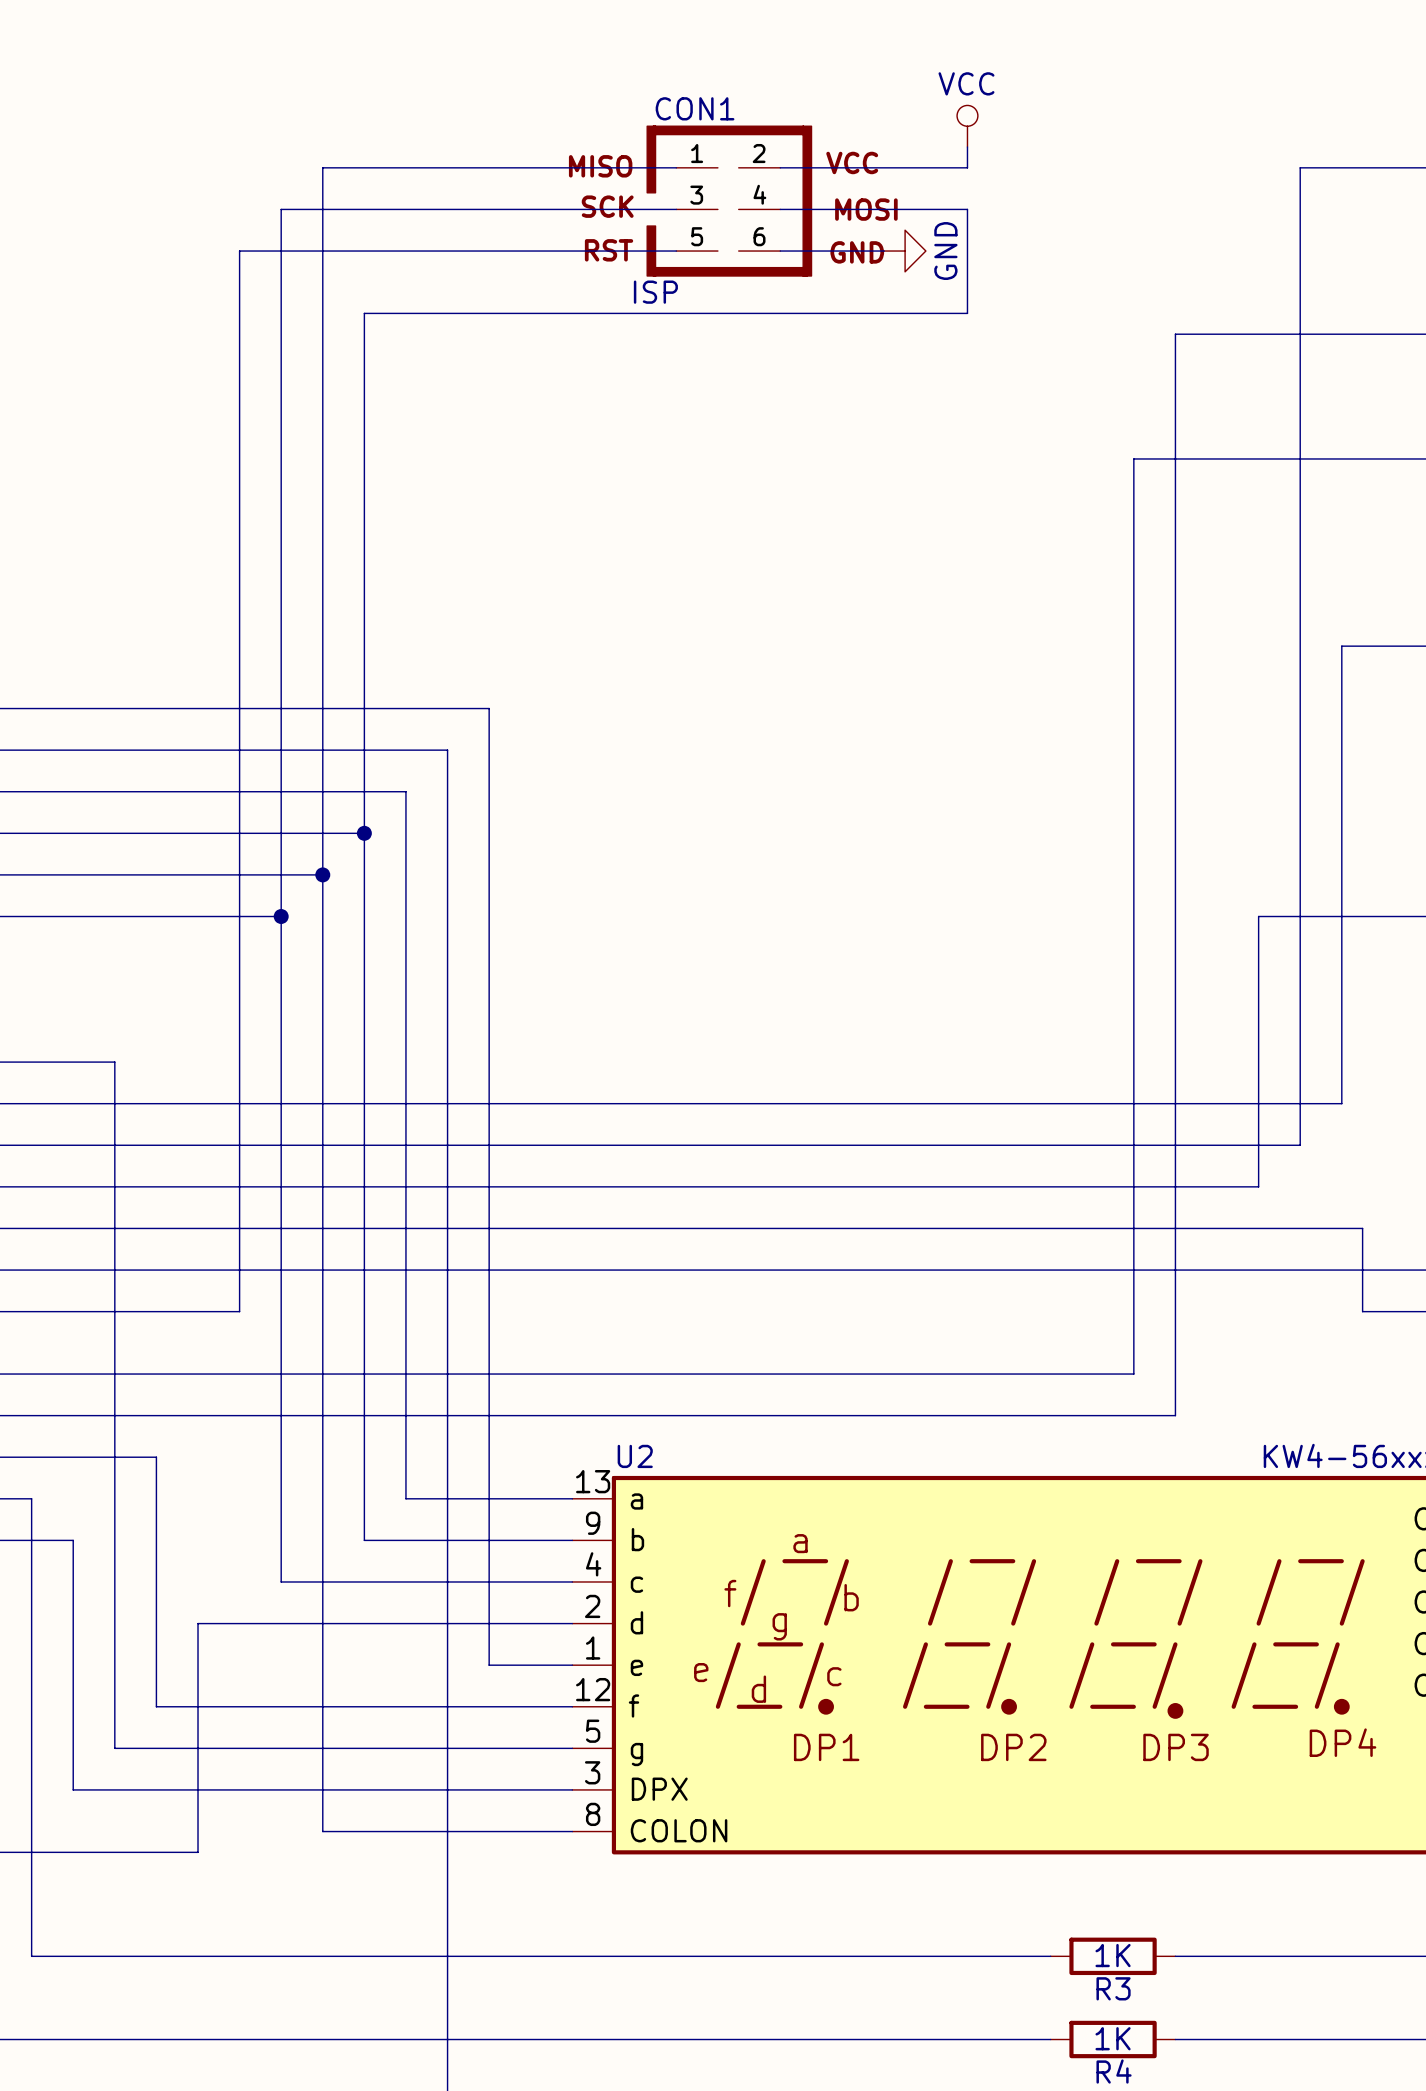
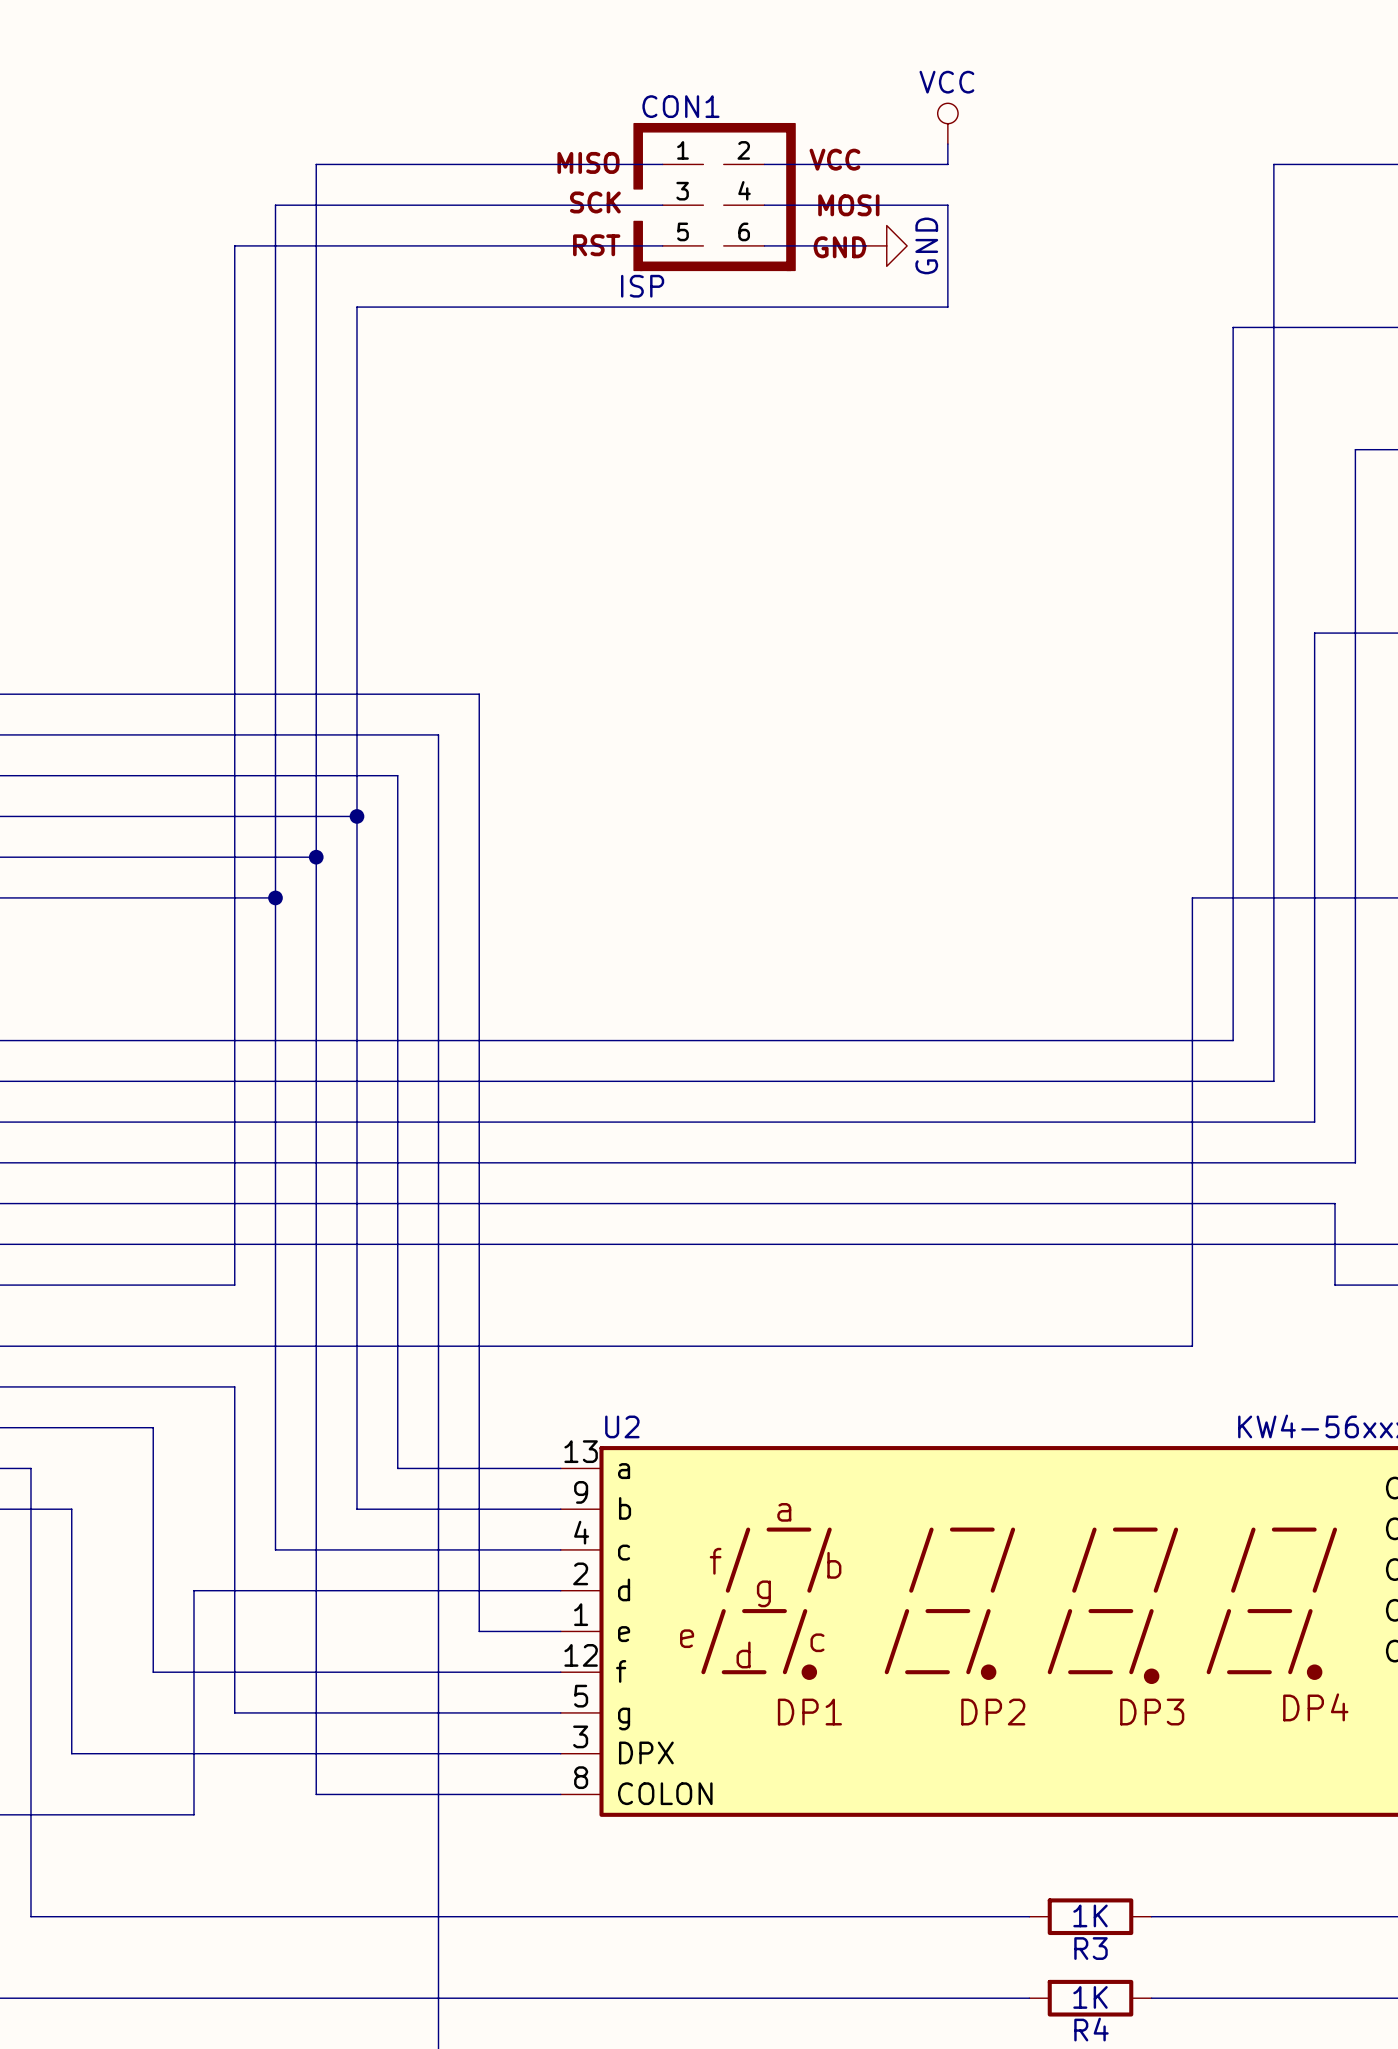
wire: (1258, 334) (1175, 334) (1175, 1415) (239, 1415) -> none
wire: (1383, 458) (1133, 458) (1133, 1374) -> (1233, 327) (1233, 897) (1192, 897) (1192, 1346) (1110, 1346)
wire: (114, 1062) (114, 1748) (239, 1748) -> (234, 1386) (234, 1712)
wire: none -> (112, 1040) (1233, 1040)
wire: (1258, 1062) (1258, 1186) -> (1355, 449) (1355, 1162) (1233, 1162)
wire: (1341, 1103) (1300, 1103) (1300, 1145) -> (1314, 1081) (1314, 1122) (1273, 1122)

